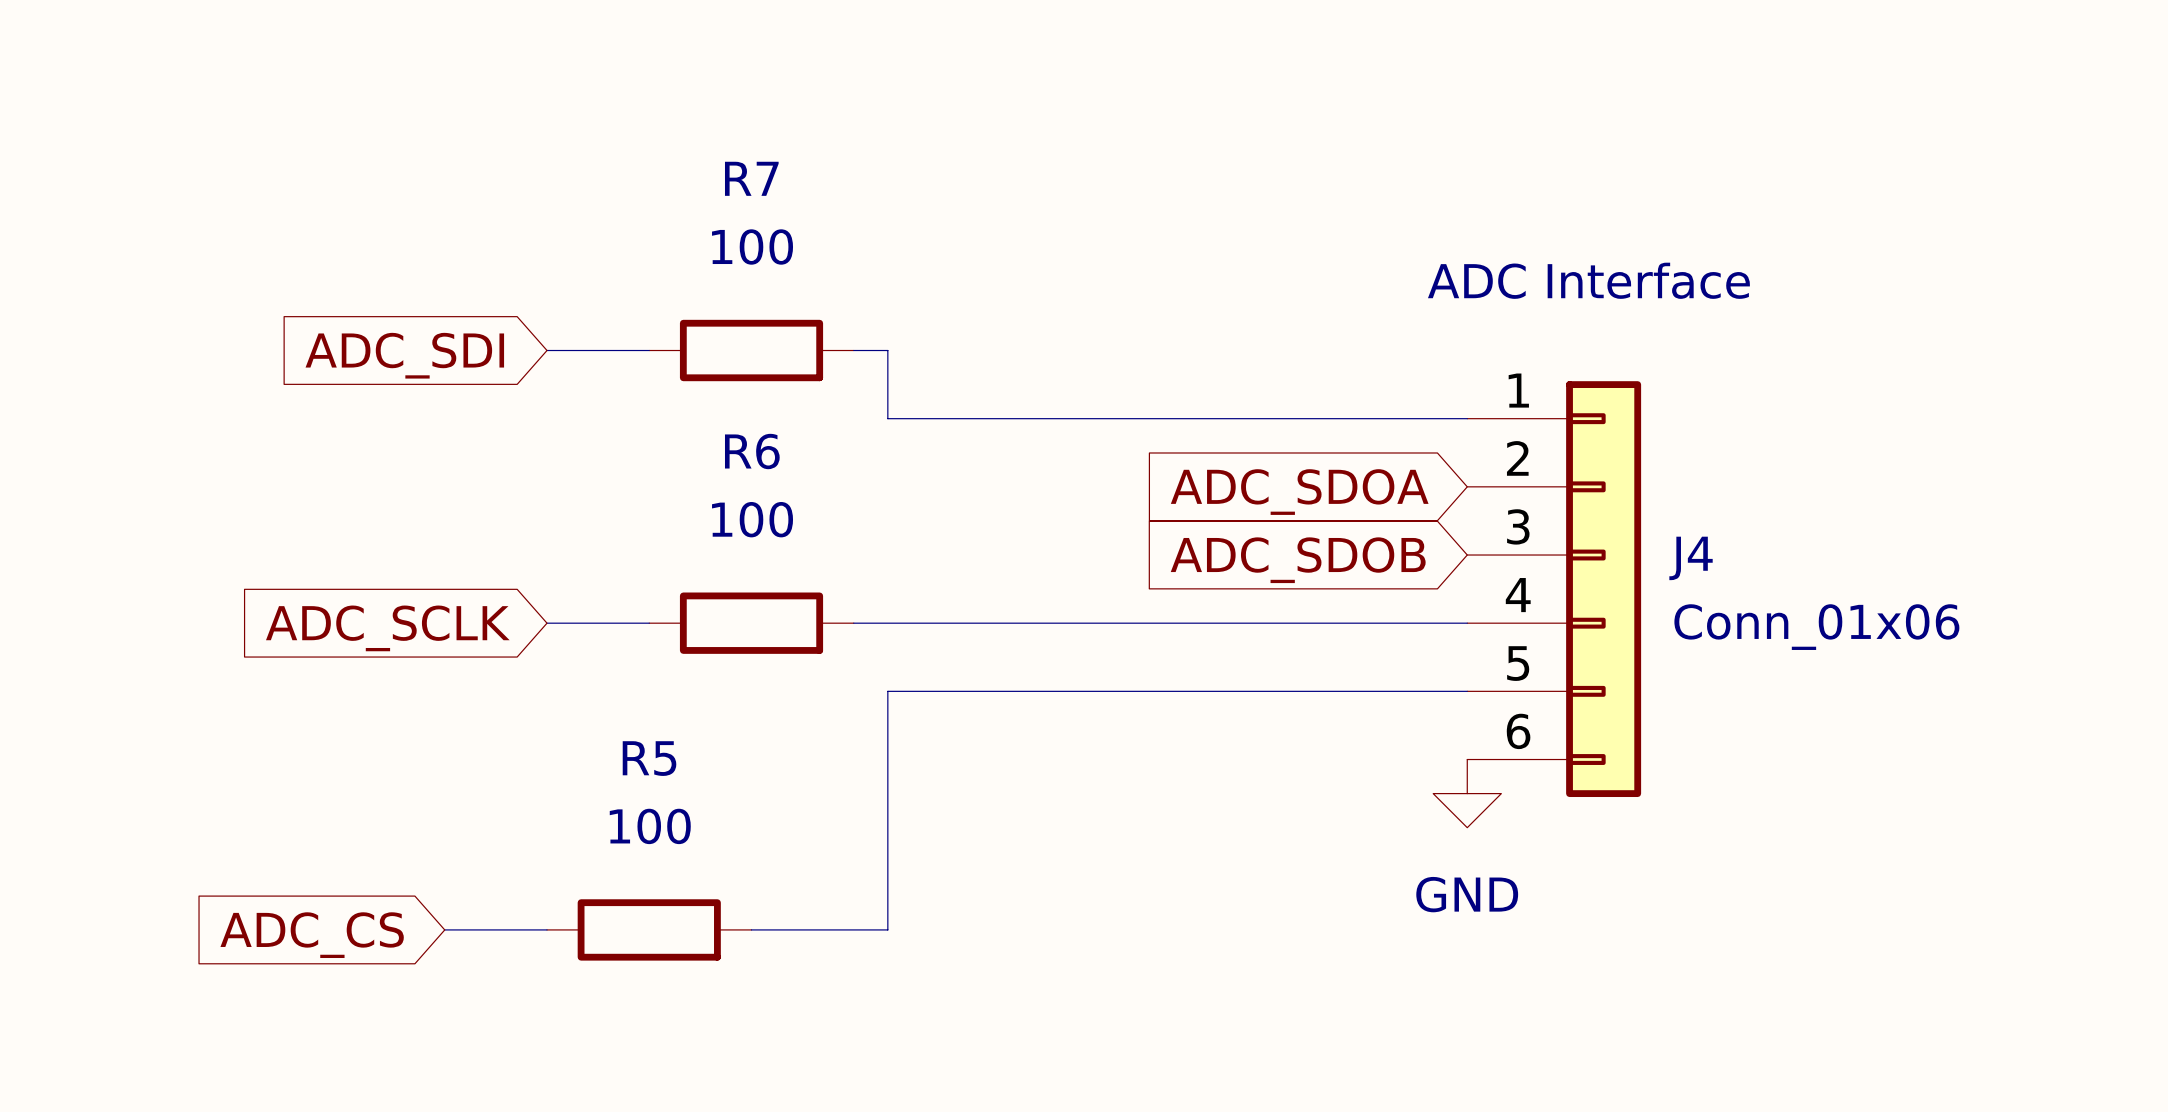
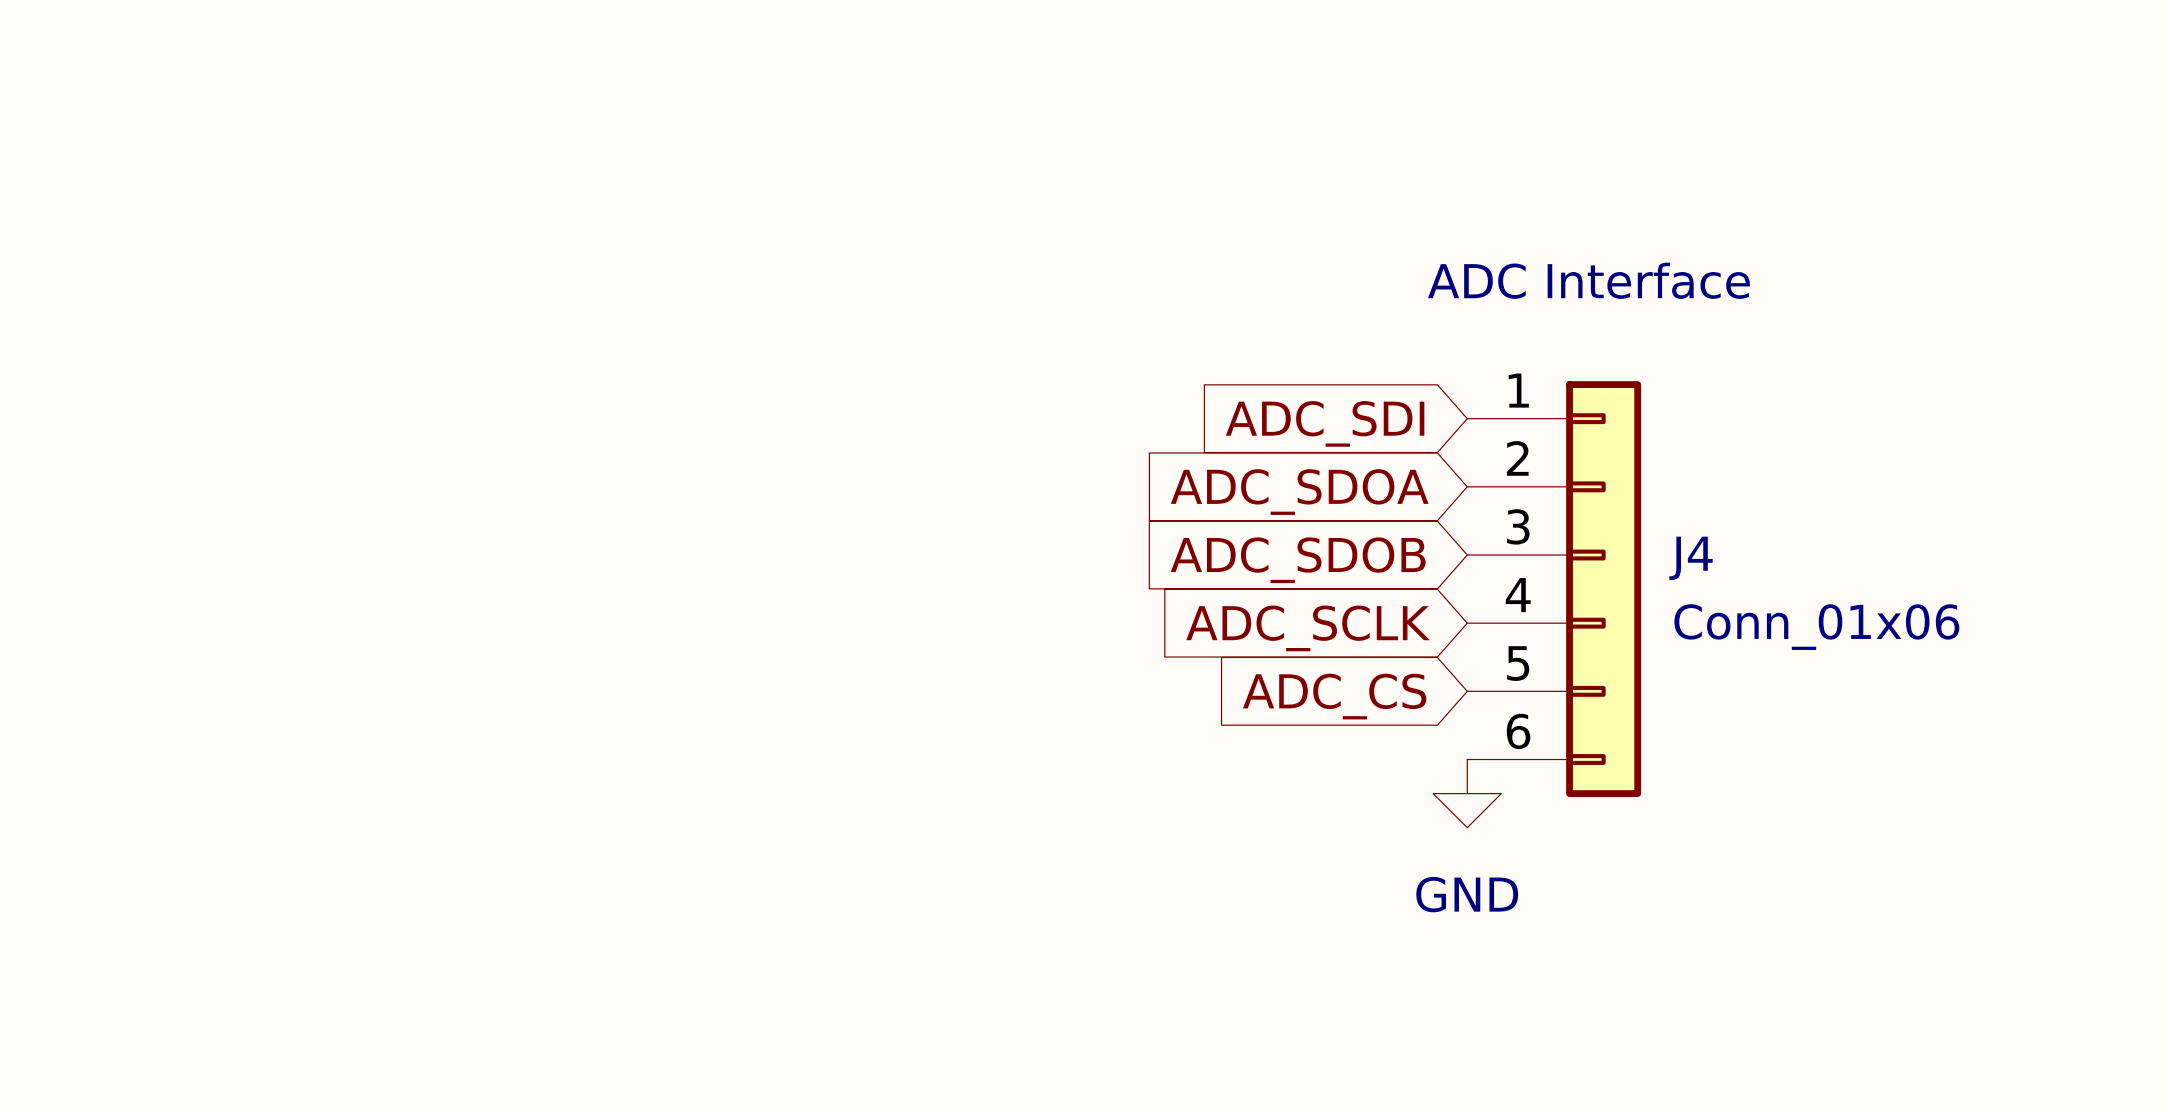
wire: (547, 350) (649, 350) -> none
R7: 100 (751, 350) -> none
wire: (853, 350) (887, 350) (887, 418) (1467, 418) -> none
global label: ADC_SDI (404, 355) -> none
global label: none -> ADC_SDI (1325, 423)
wire: (547, 623) (649, 623) -> none
R6: 100 (751, 623) -> none
wire: (853, 623) (1467, 623) -> none
global label: ADC_SCLK (387, 628) -> none
global label: none -> ADC_SCLK (1308, 628)
wire: (1467, 691) (887, 691) (887, 929) (751, 929) -> none
global label: none -> ADC_CS (1334, 696)
wire: (444, 929) (547, 929) -> none
R5: 100 (649, 929) -> none
global label: ADC_CS (312, 935) -> none

